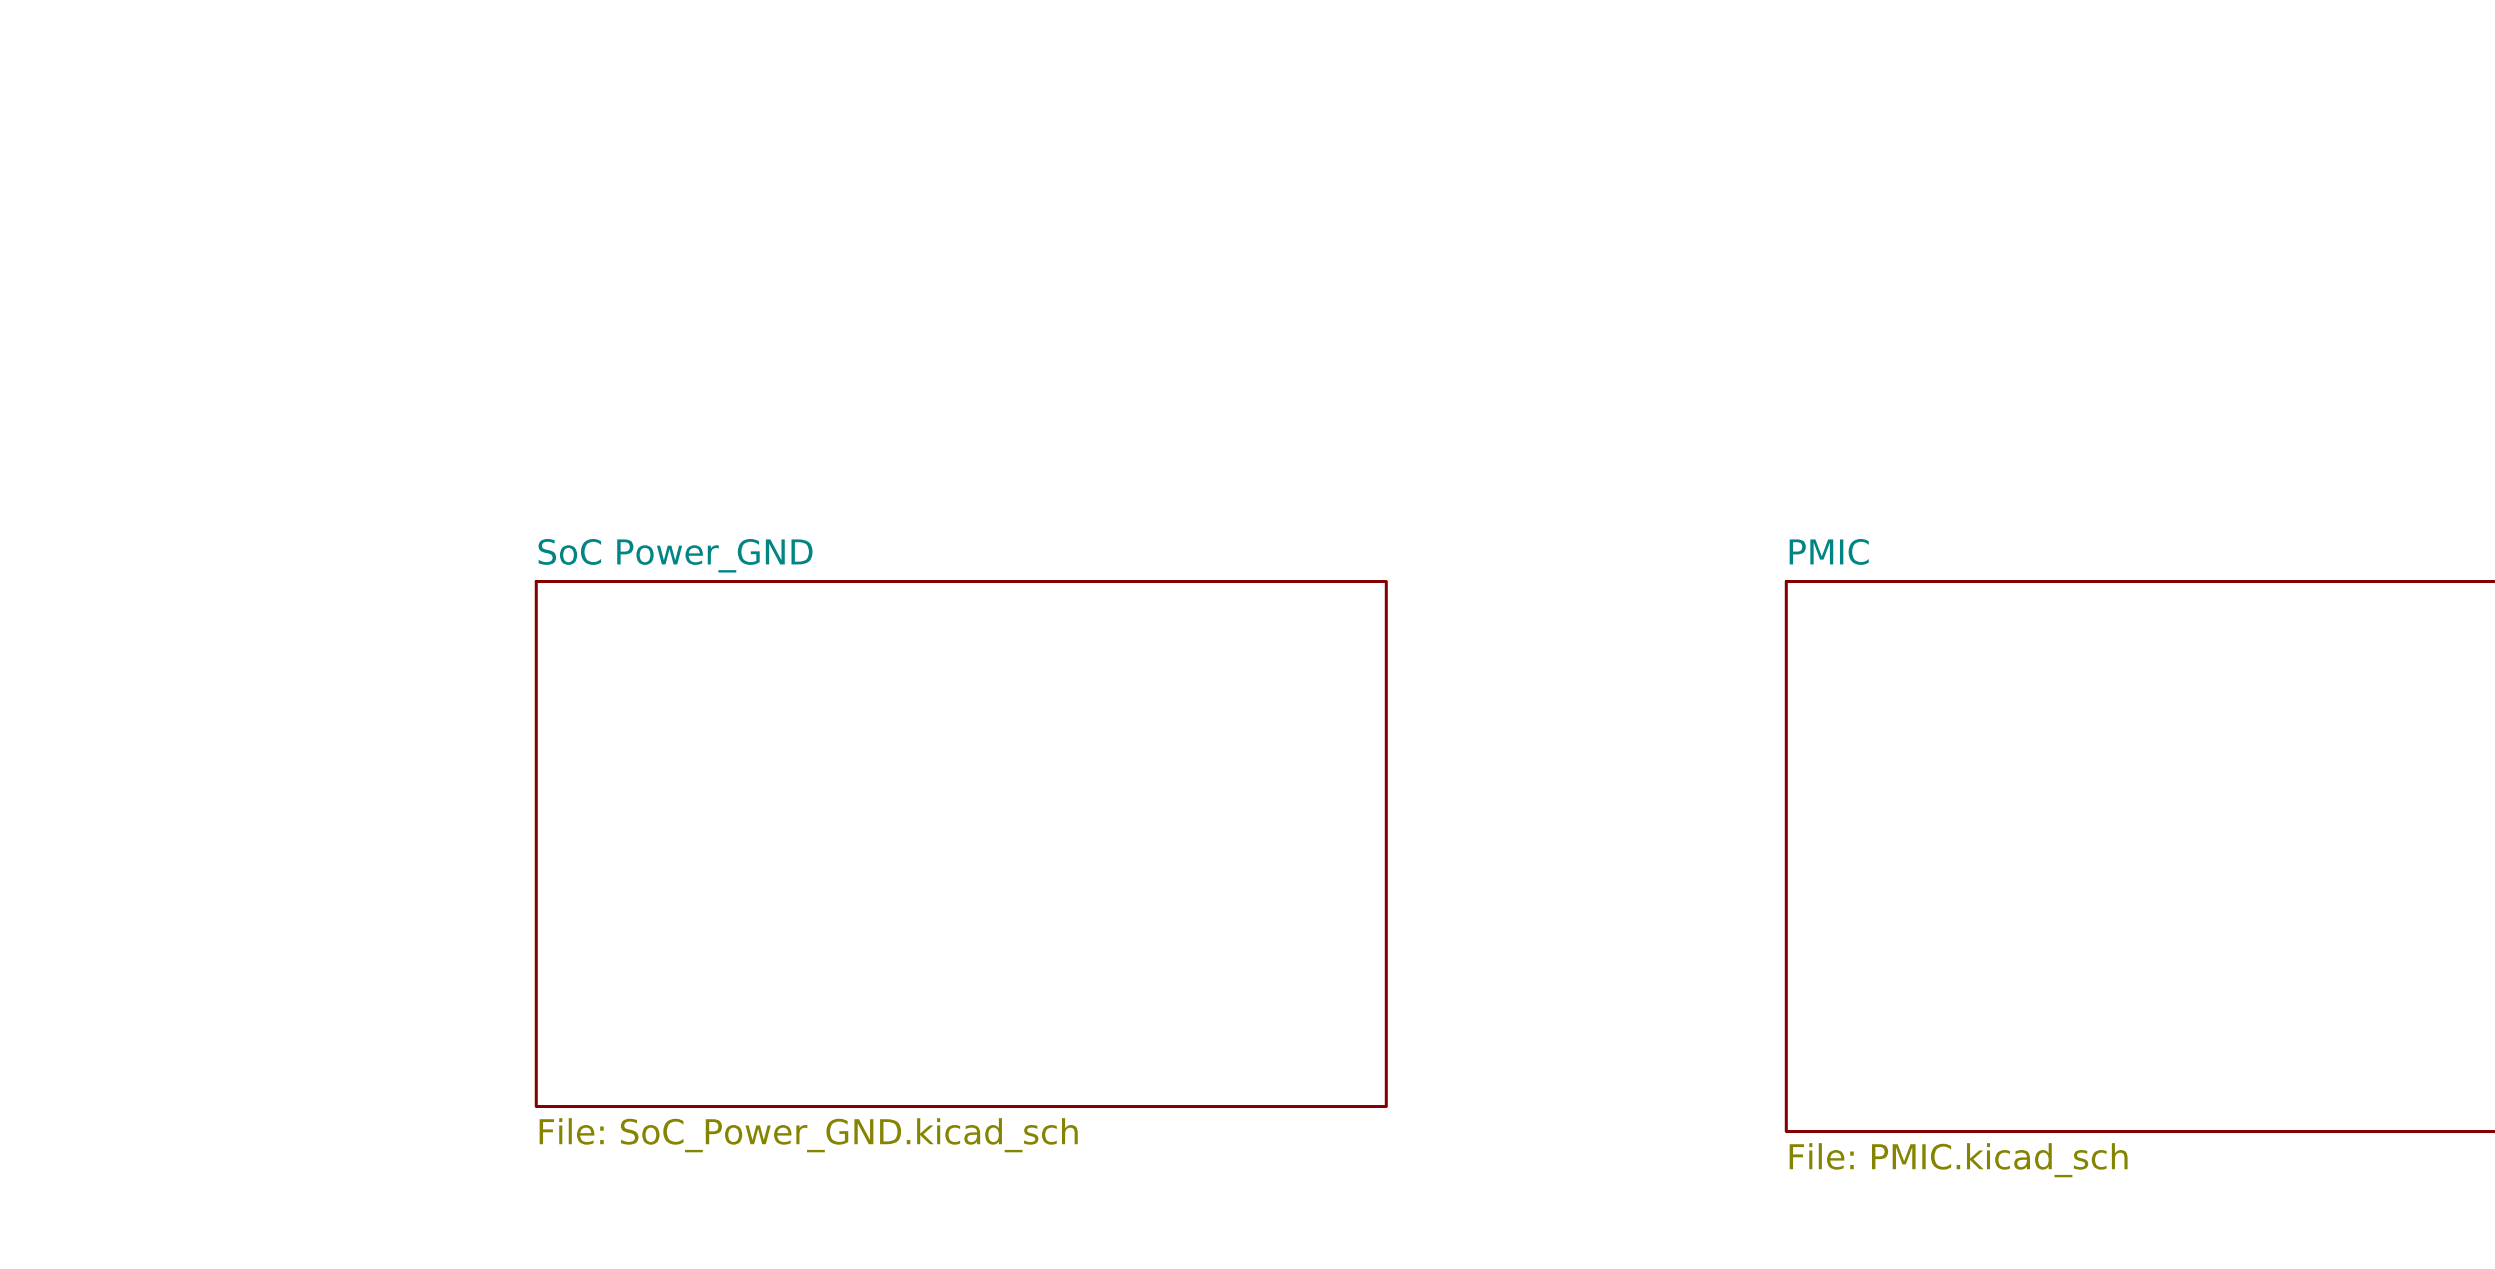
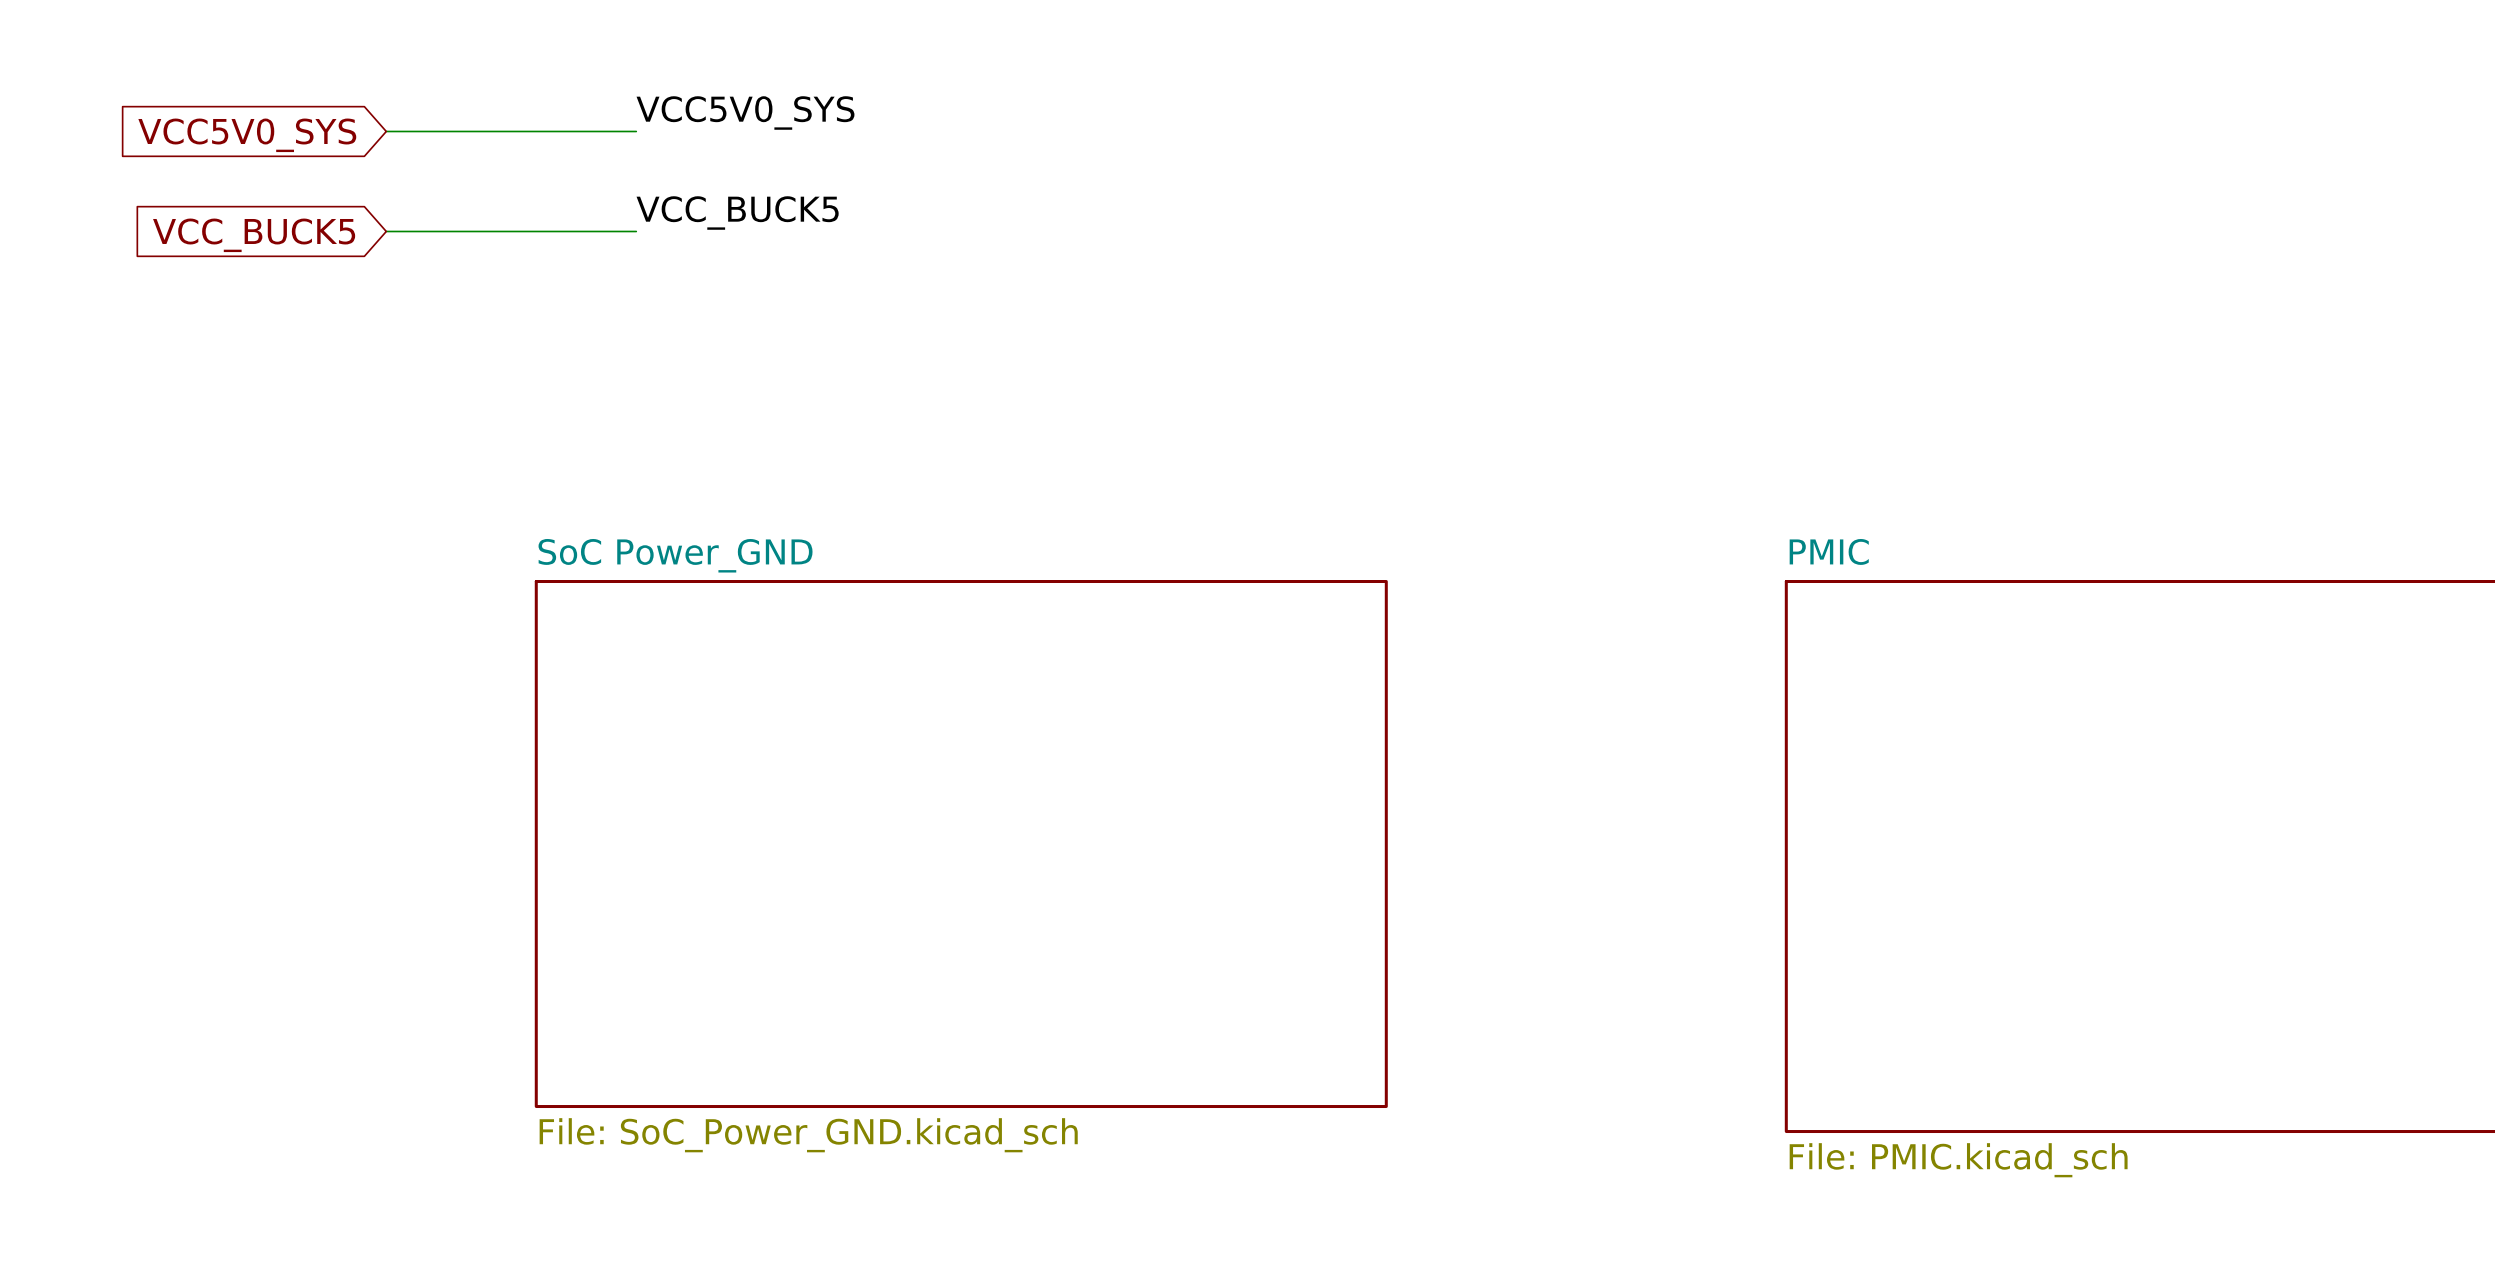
label: none -> VCC5V0_SYS (745, 112)
wire: none -> (386, 131) (636, 131)
global label: none -> VCC5V0_SYS (247, 135)
label: none -> VCC_BUCK5 (737, 213)
wire: none -> (386, 231) (636, 231)
global label: none -> VCC_BUCK5 (254, 235)

